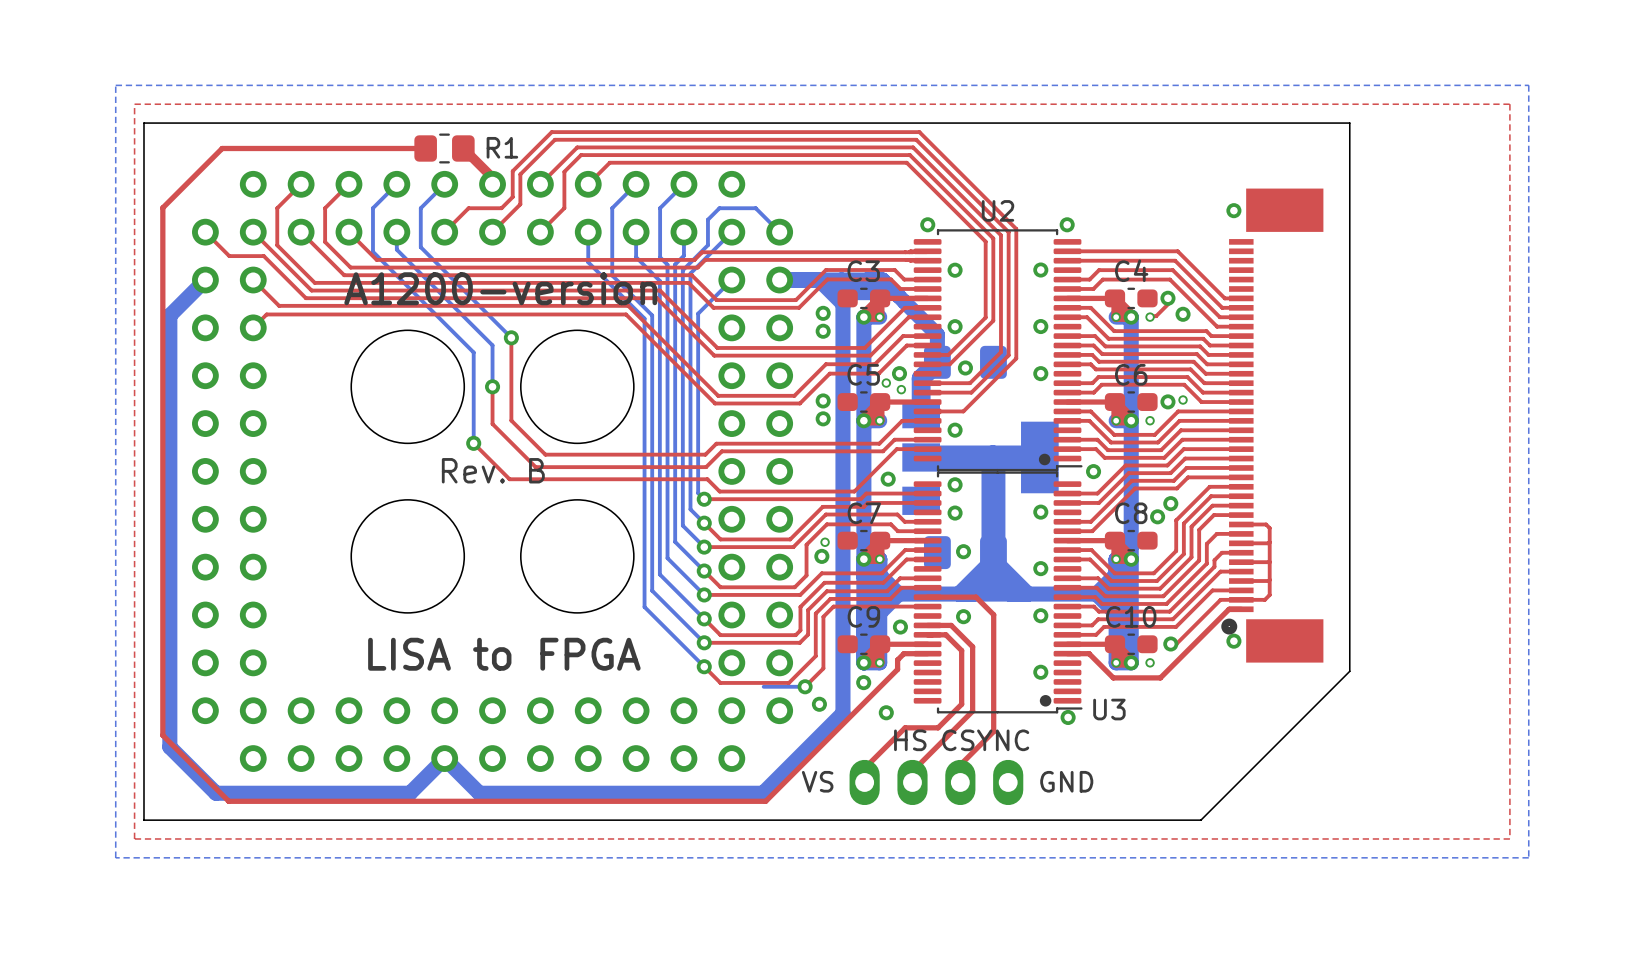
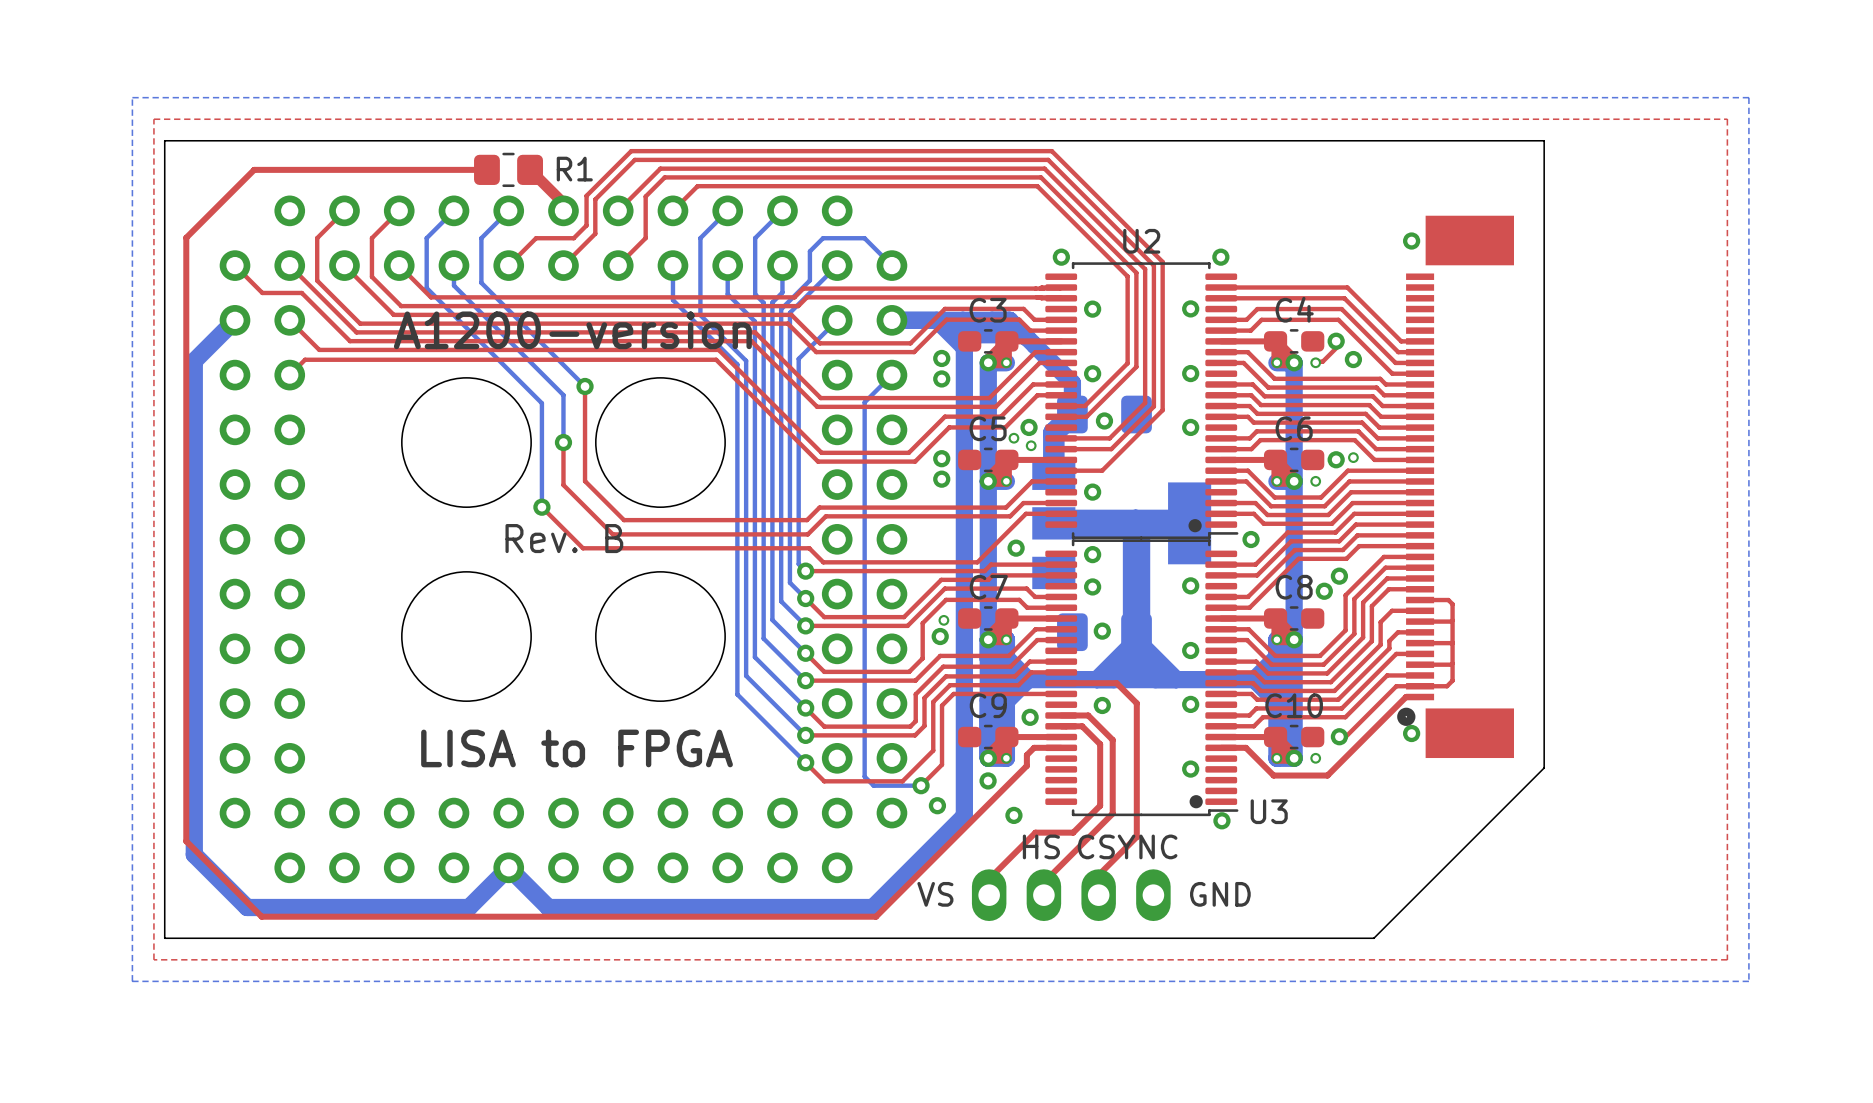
bottom track: none -> (891, 375) (864, 402) (864, 776) (873, 785)

